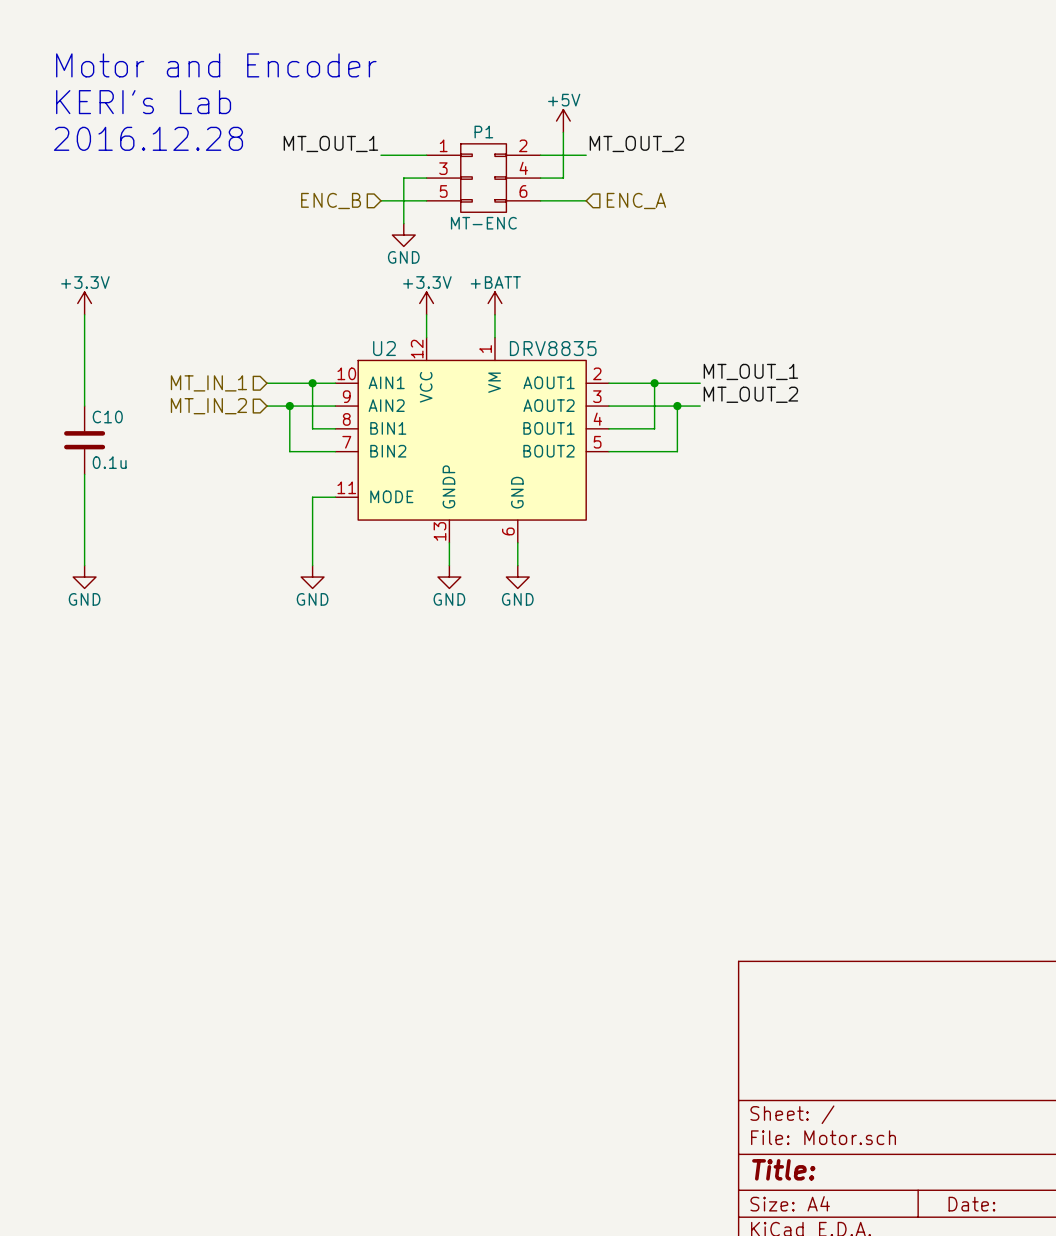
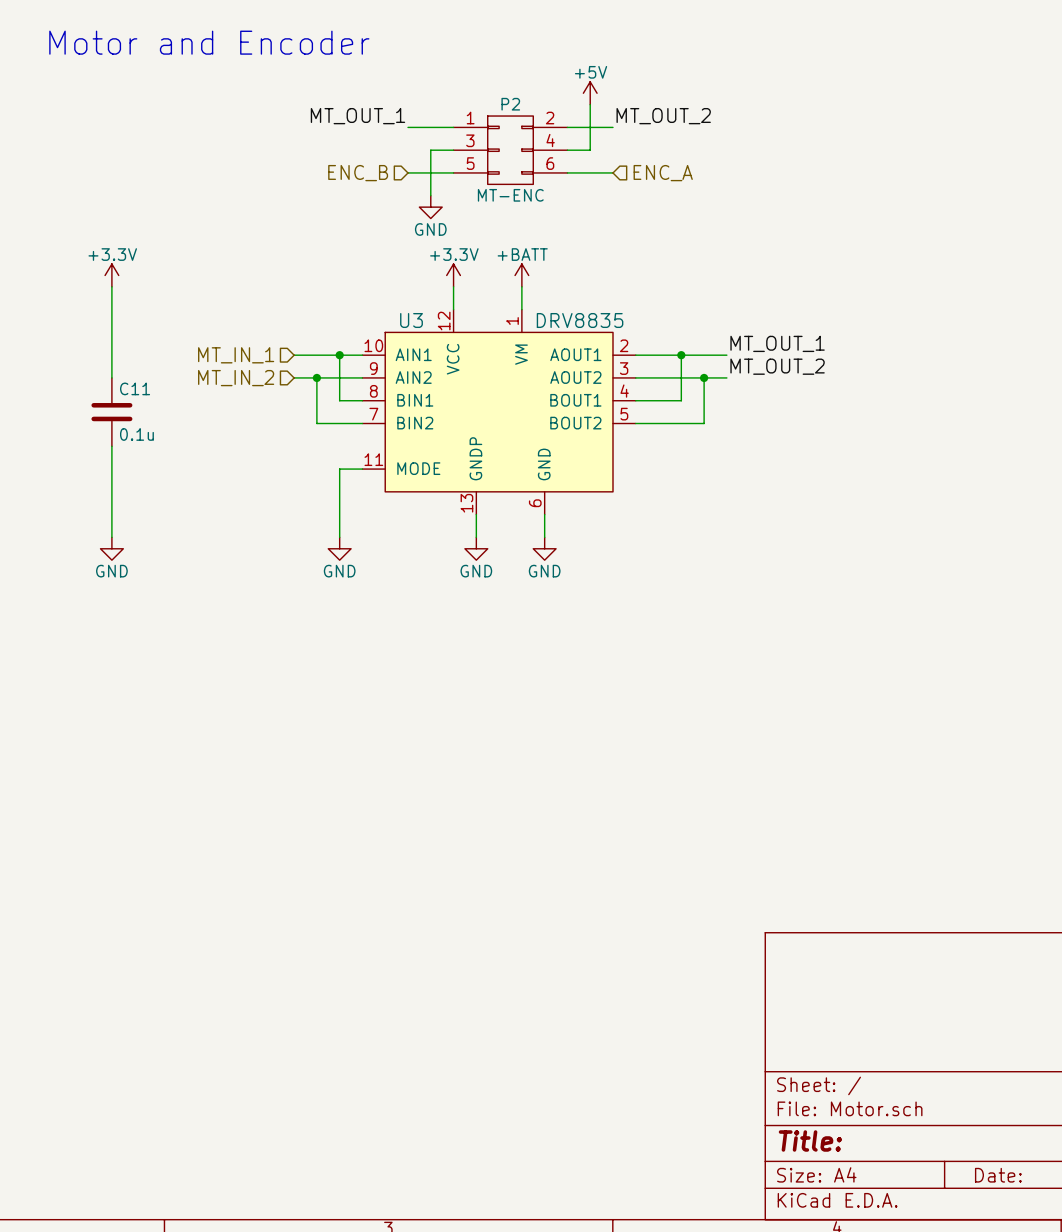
text position: Motor and Encoder (216, 65) -> Motor and Encoder (209, 42)
text: KERI's Lab (143, 102) -> none
P1 name: P1 (483, 132) -> P2 (510, 104)
text: 2016.12.28 (148, 138) -> none
U2 name: U2 (384, 348) -> U3 (411, 320)
C10 name: C10 (107, 417) -> C11 (135, 388)

